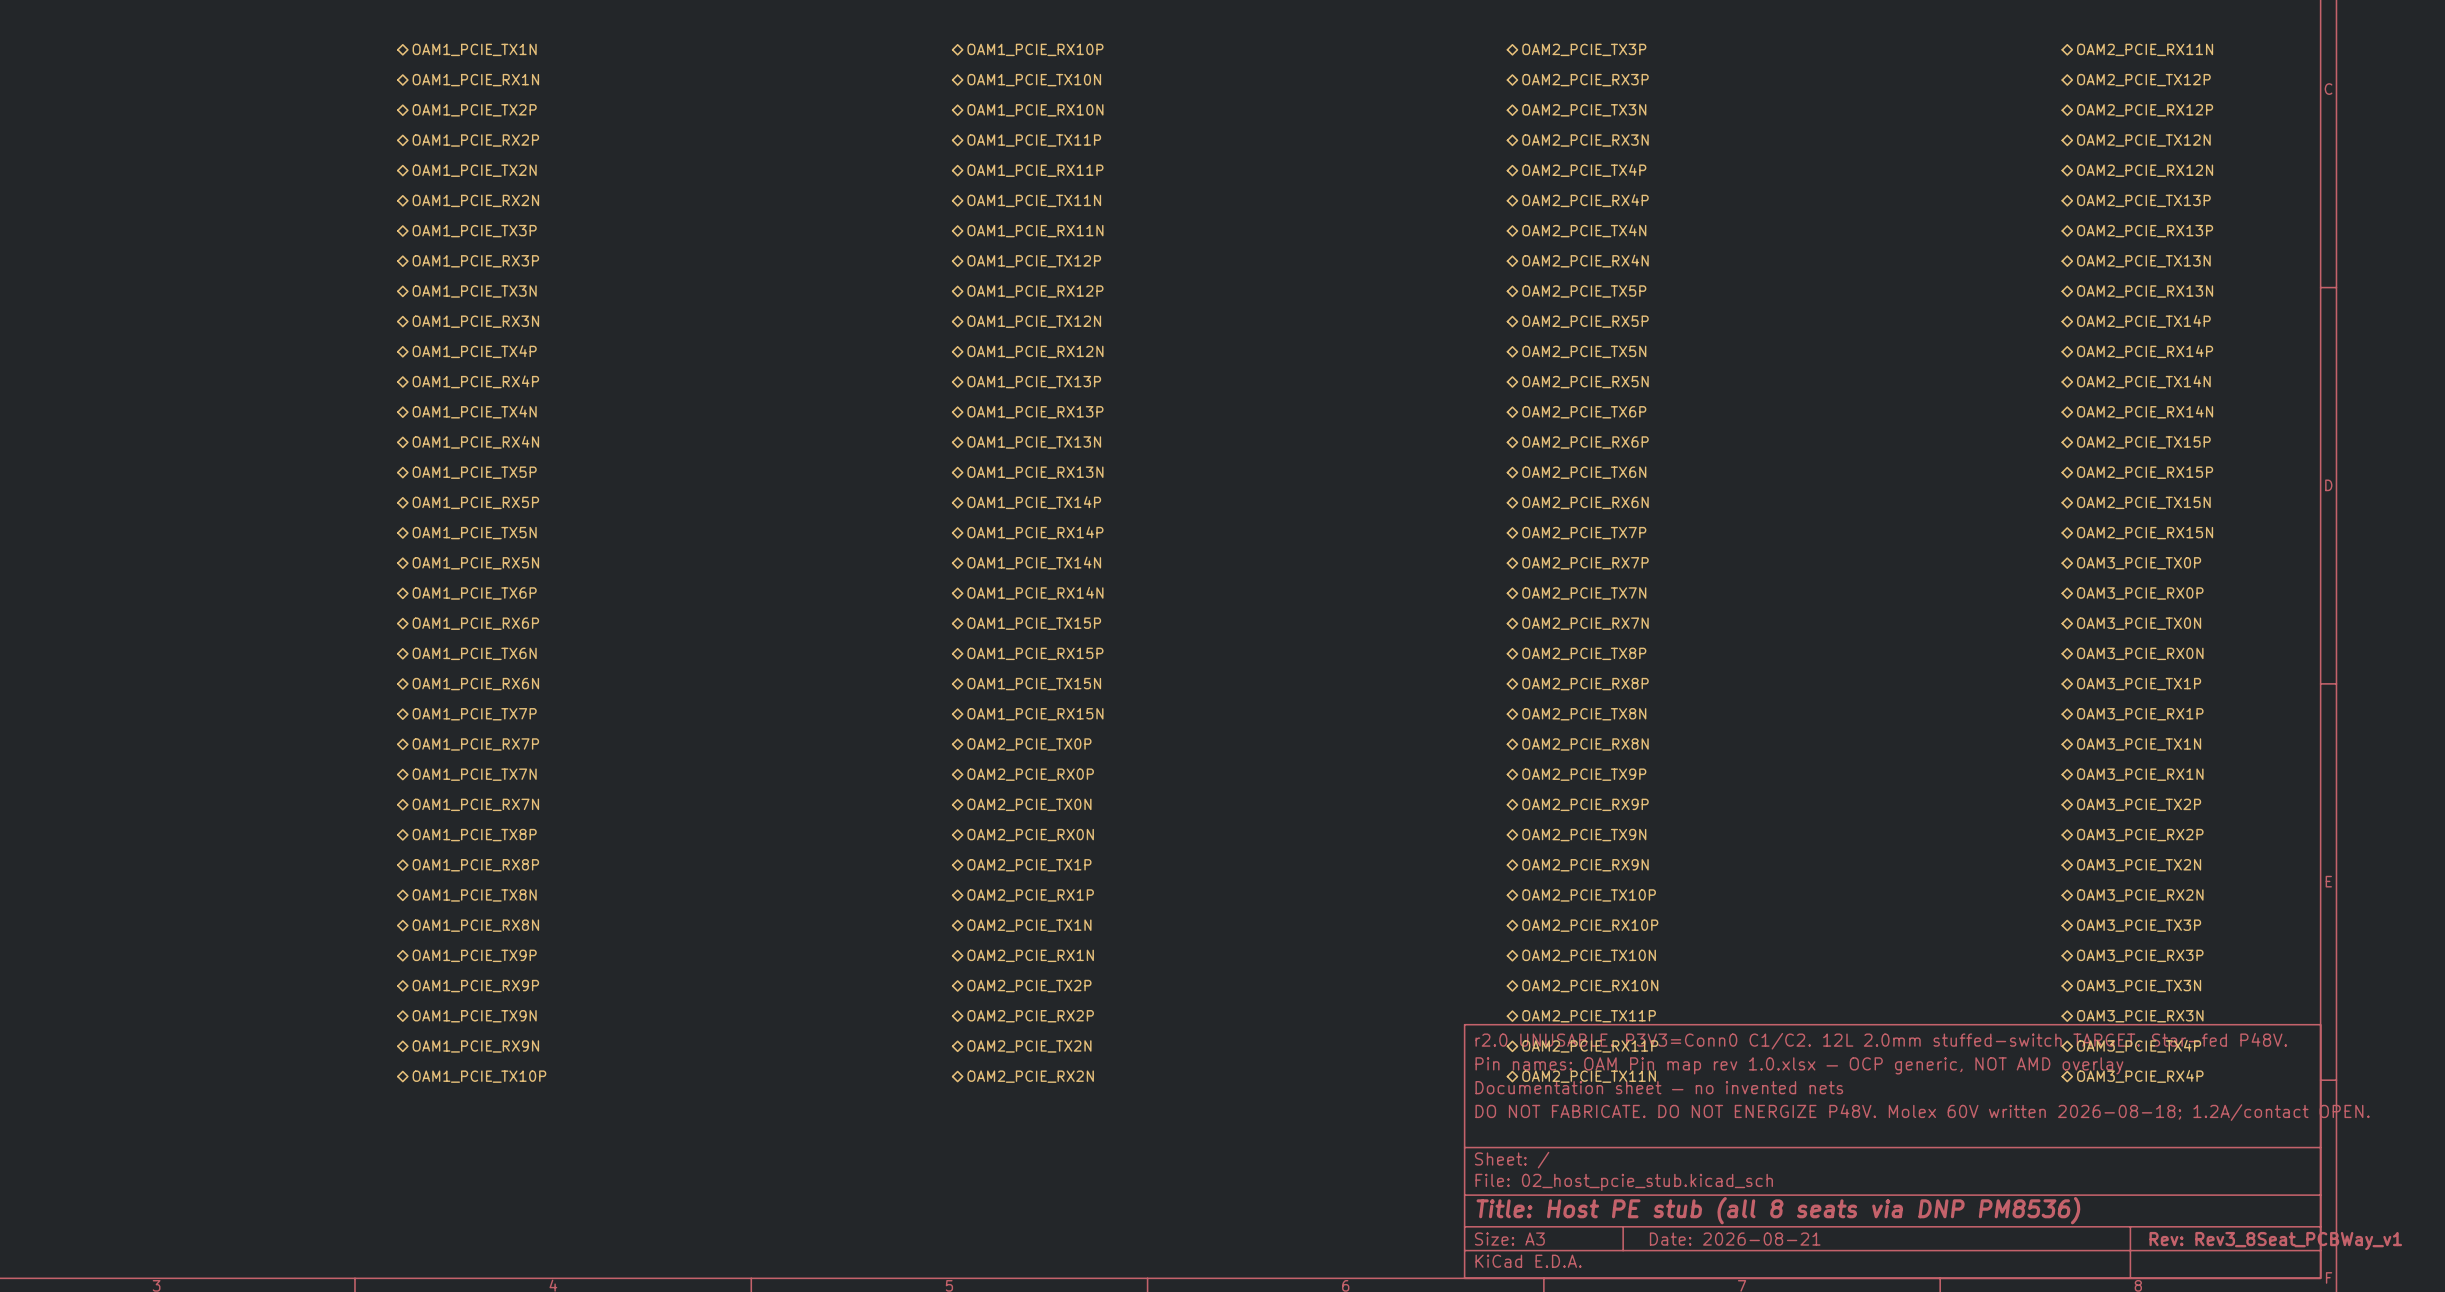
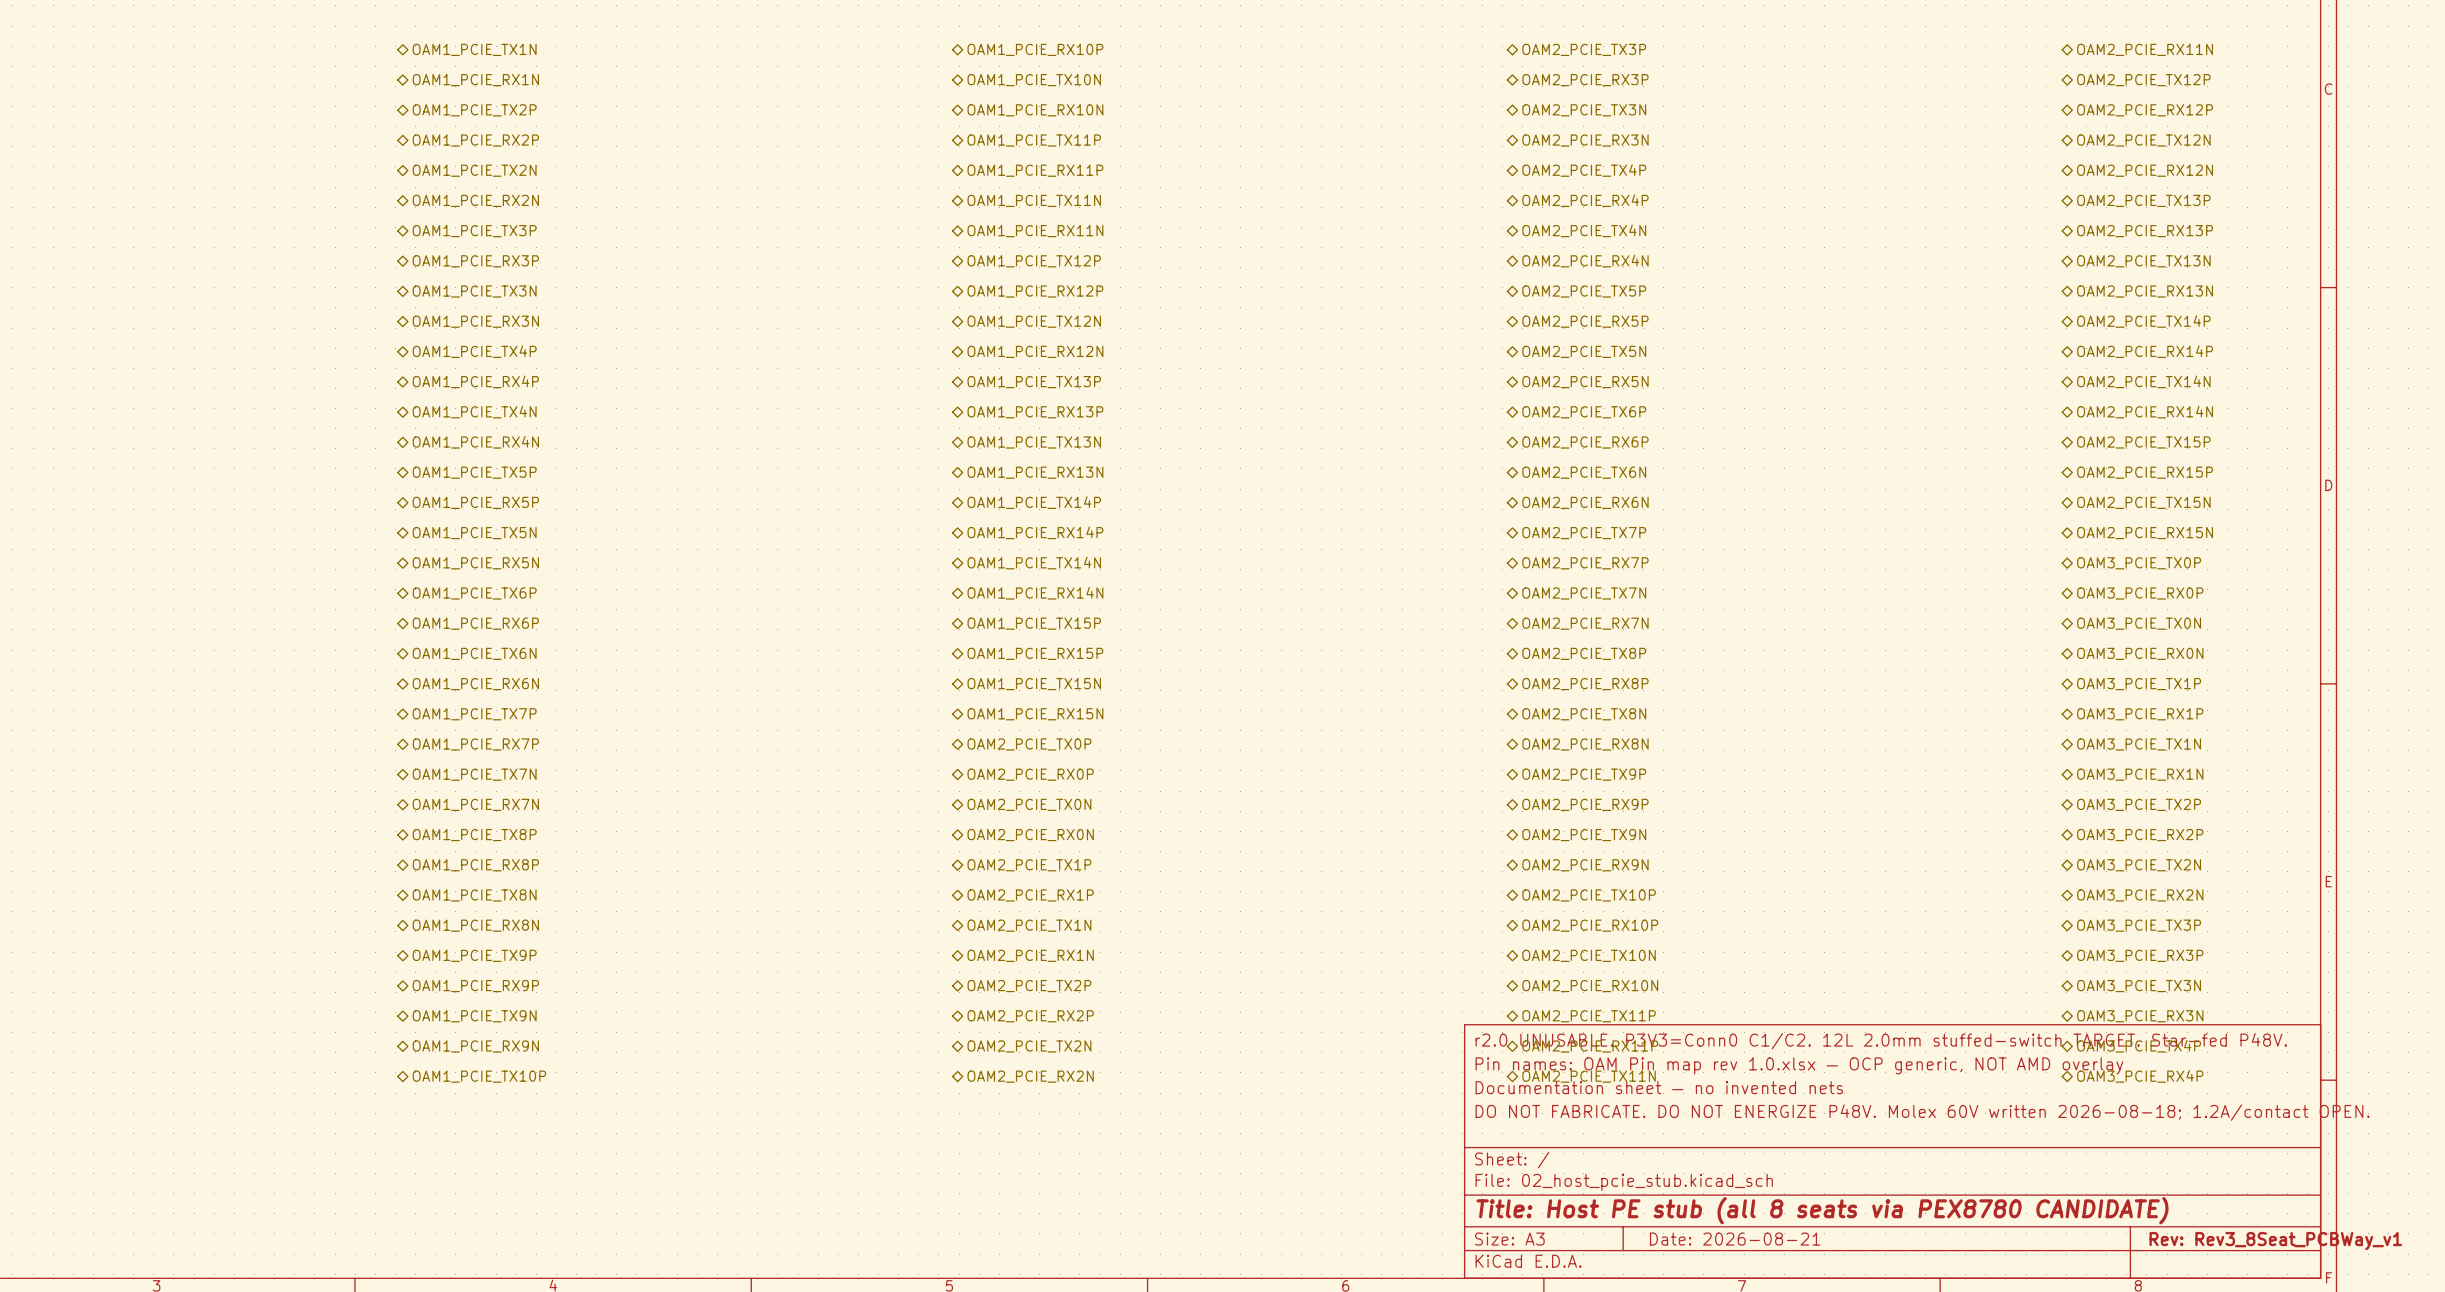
title block: Title: Host PE stub (all 8 seats via DNP PM8536) (1778, 1210) -> Title: Host PE stub (all 8 seats via PEX8780 CANDIDATE) (1822, 1210)

